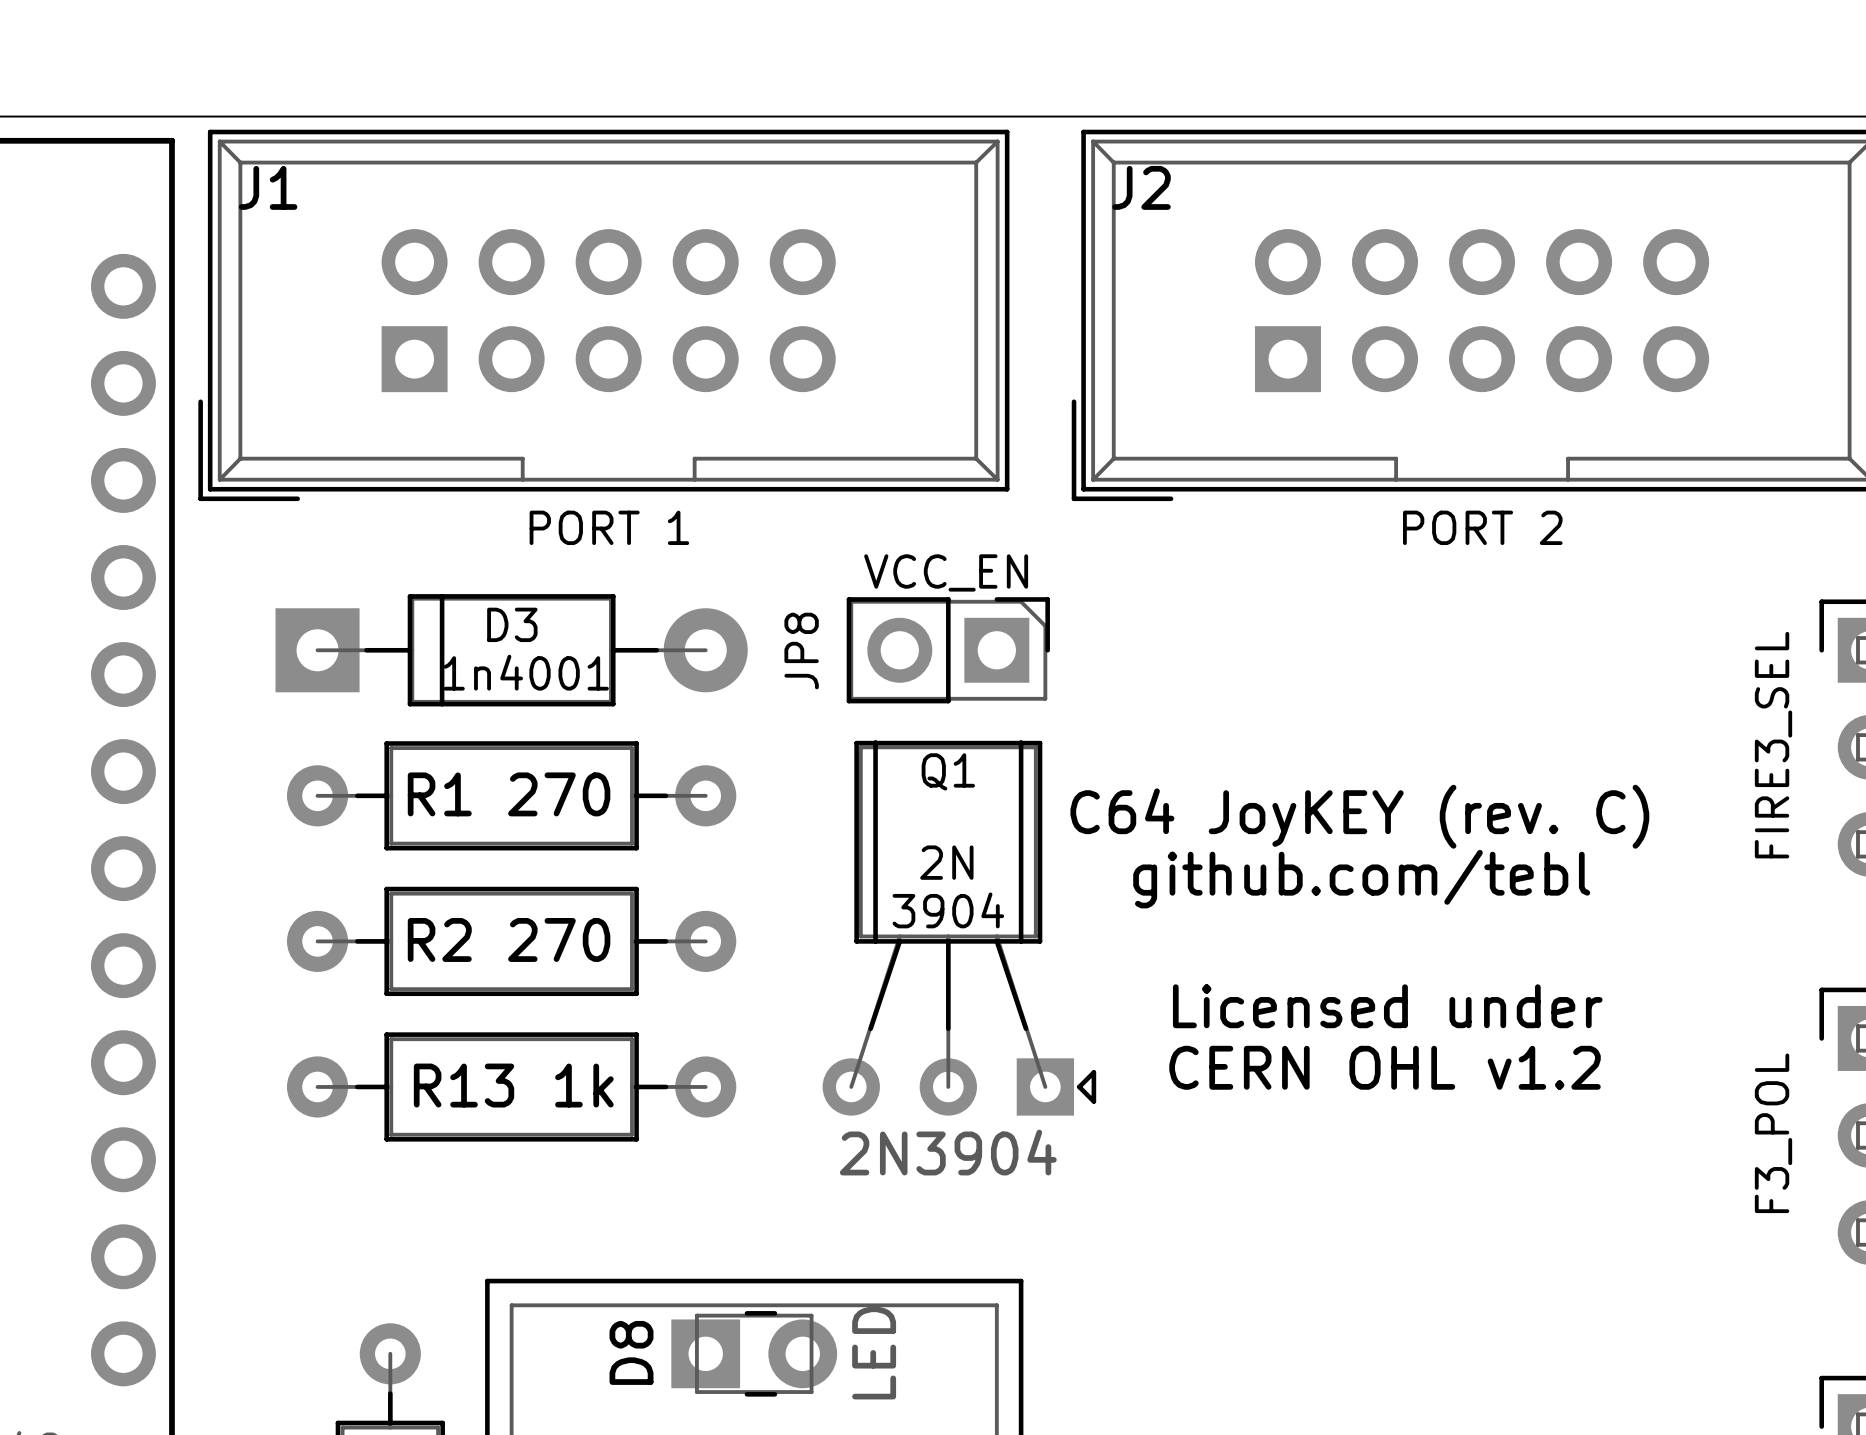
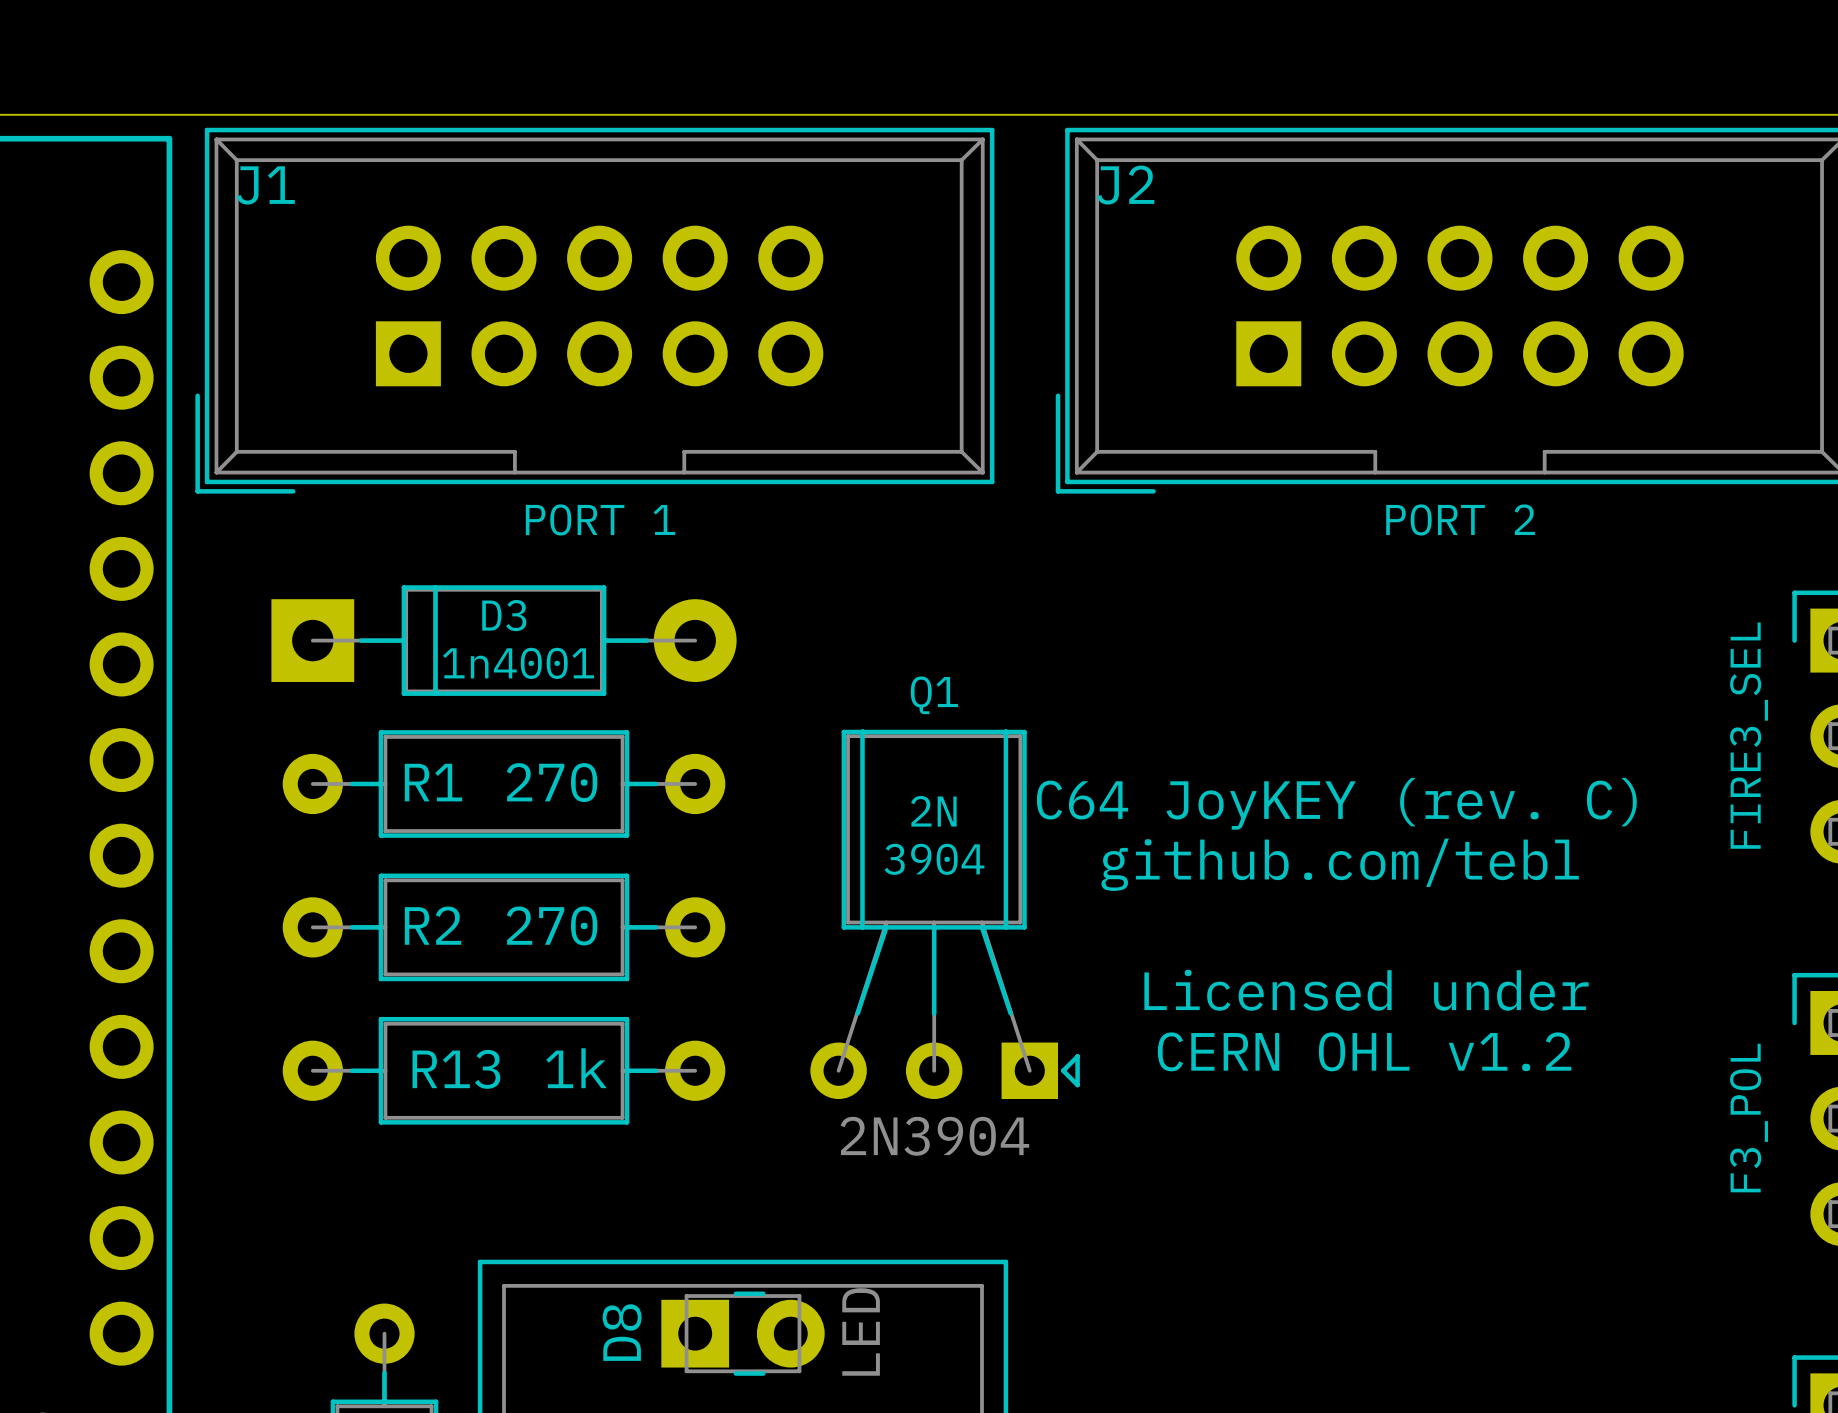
JP8: VCC_EN (948, 650) -> none
Q1 name position: Q1 (948, 771) -> Q1 (934, 695)
Q1 text position: 2N (946, 862) -> 2N (933, 811)
Q1 text position: 3904 (948, 910) -> 3904 (934, 859)

